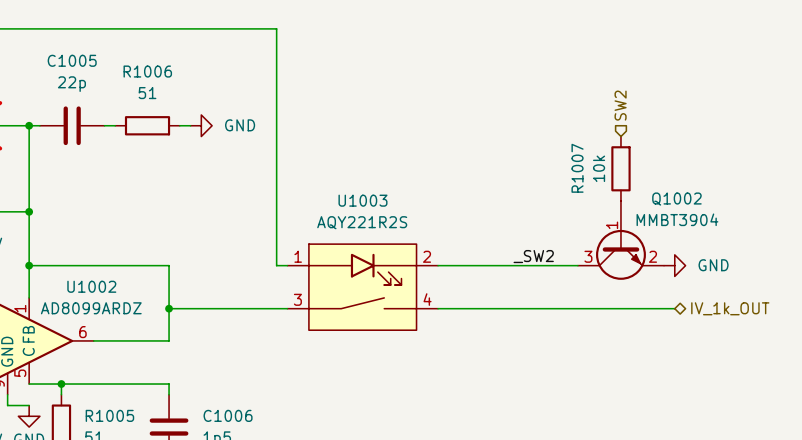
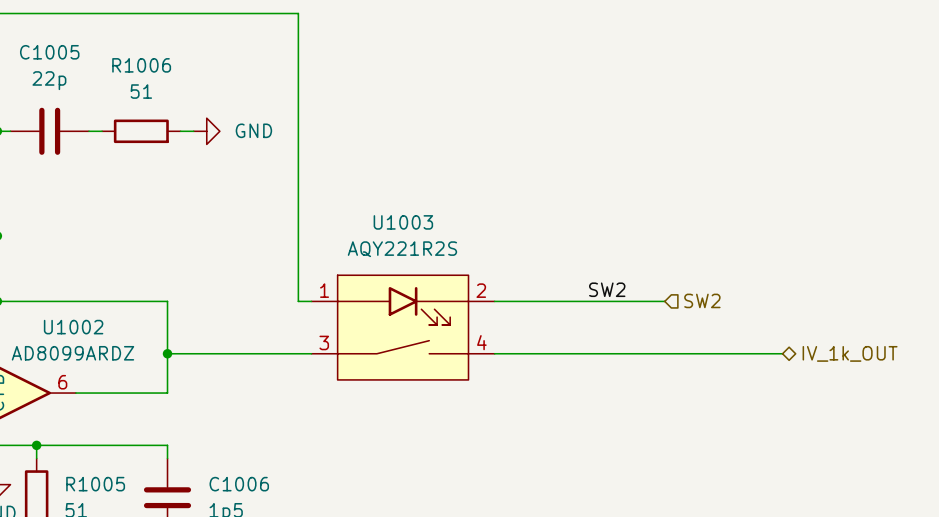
hierarchical label rotation: 0° (620, 105) -> 90° clockwise (702, 300)
hierarchical label position: SW2 (620, 105) -> SW2 (702, 300)
R1007: 10k (620, 168) -> none
Q1002: MMBT3904 (620, 240) -> none
label: _SW2 (533, 256) -> SW2 (607, 289)
power symbol: GND (674, 265) -> none

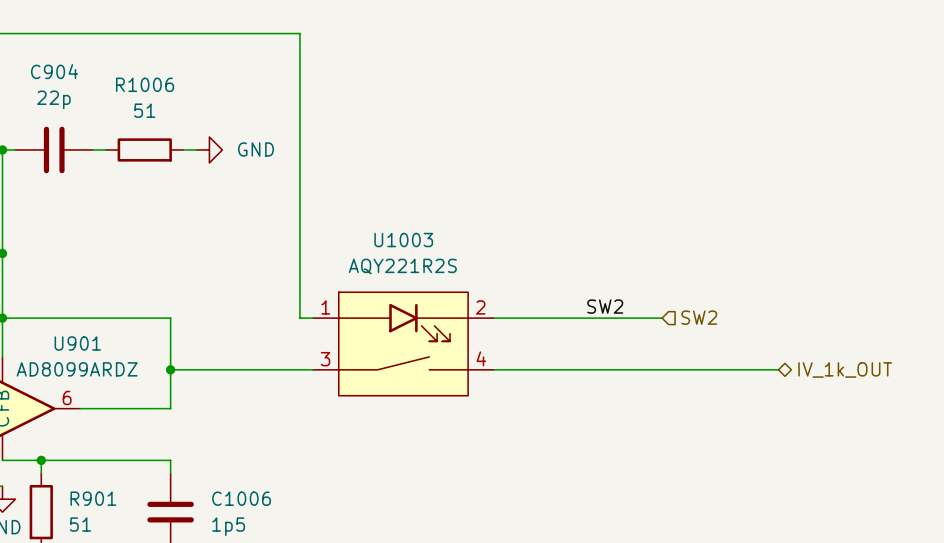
C1005 name: C1005 (49, 52) -> C904 (54, 71)
U1002 name: U1002 (73, 327) -> U901 (77, 343)
R1005 name: R1005 (95, 484) -> R901 (93, 498)

